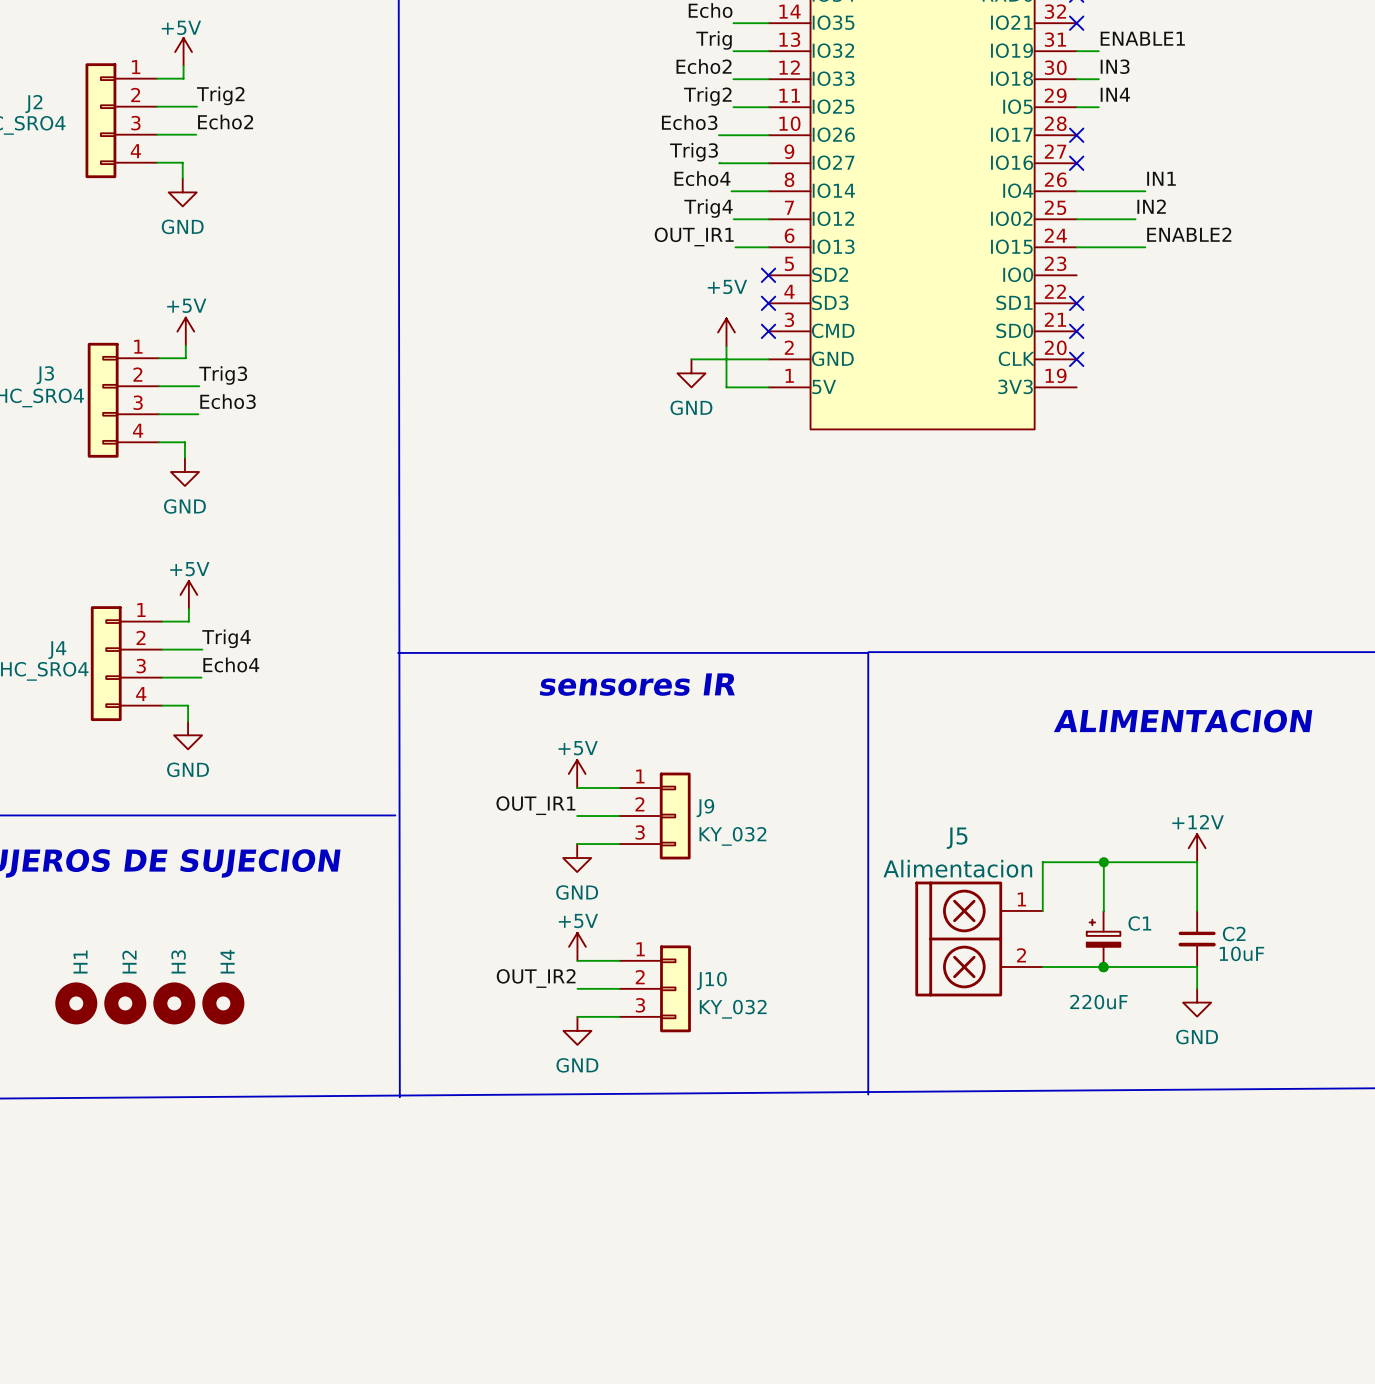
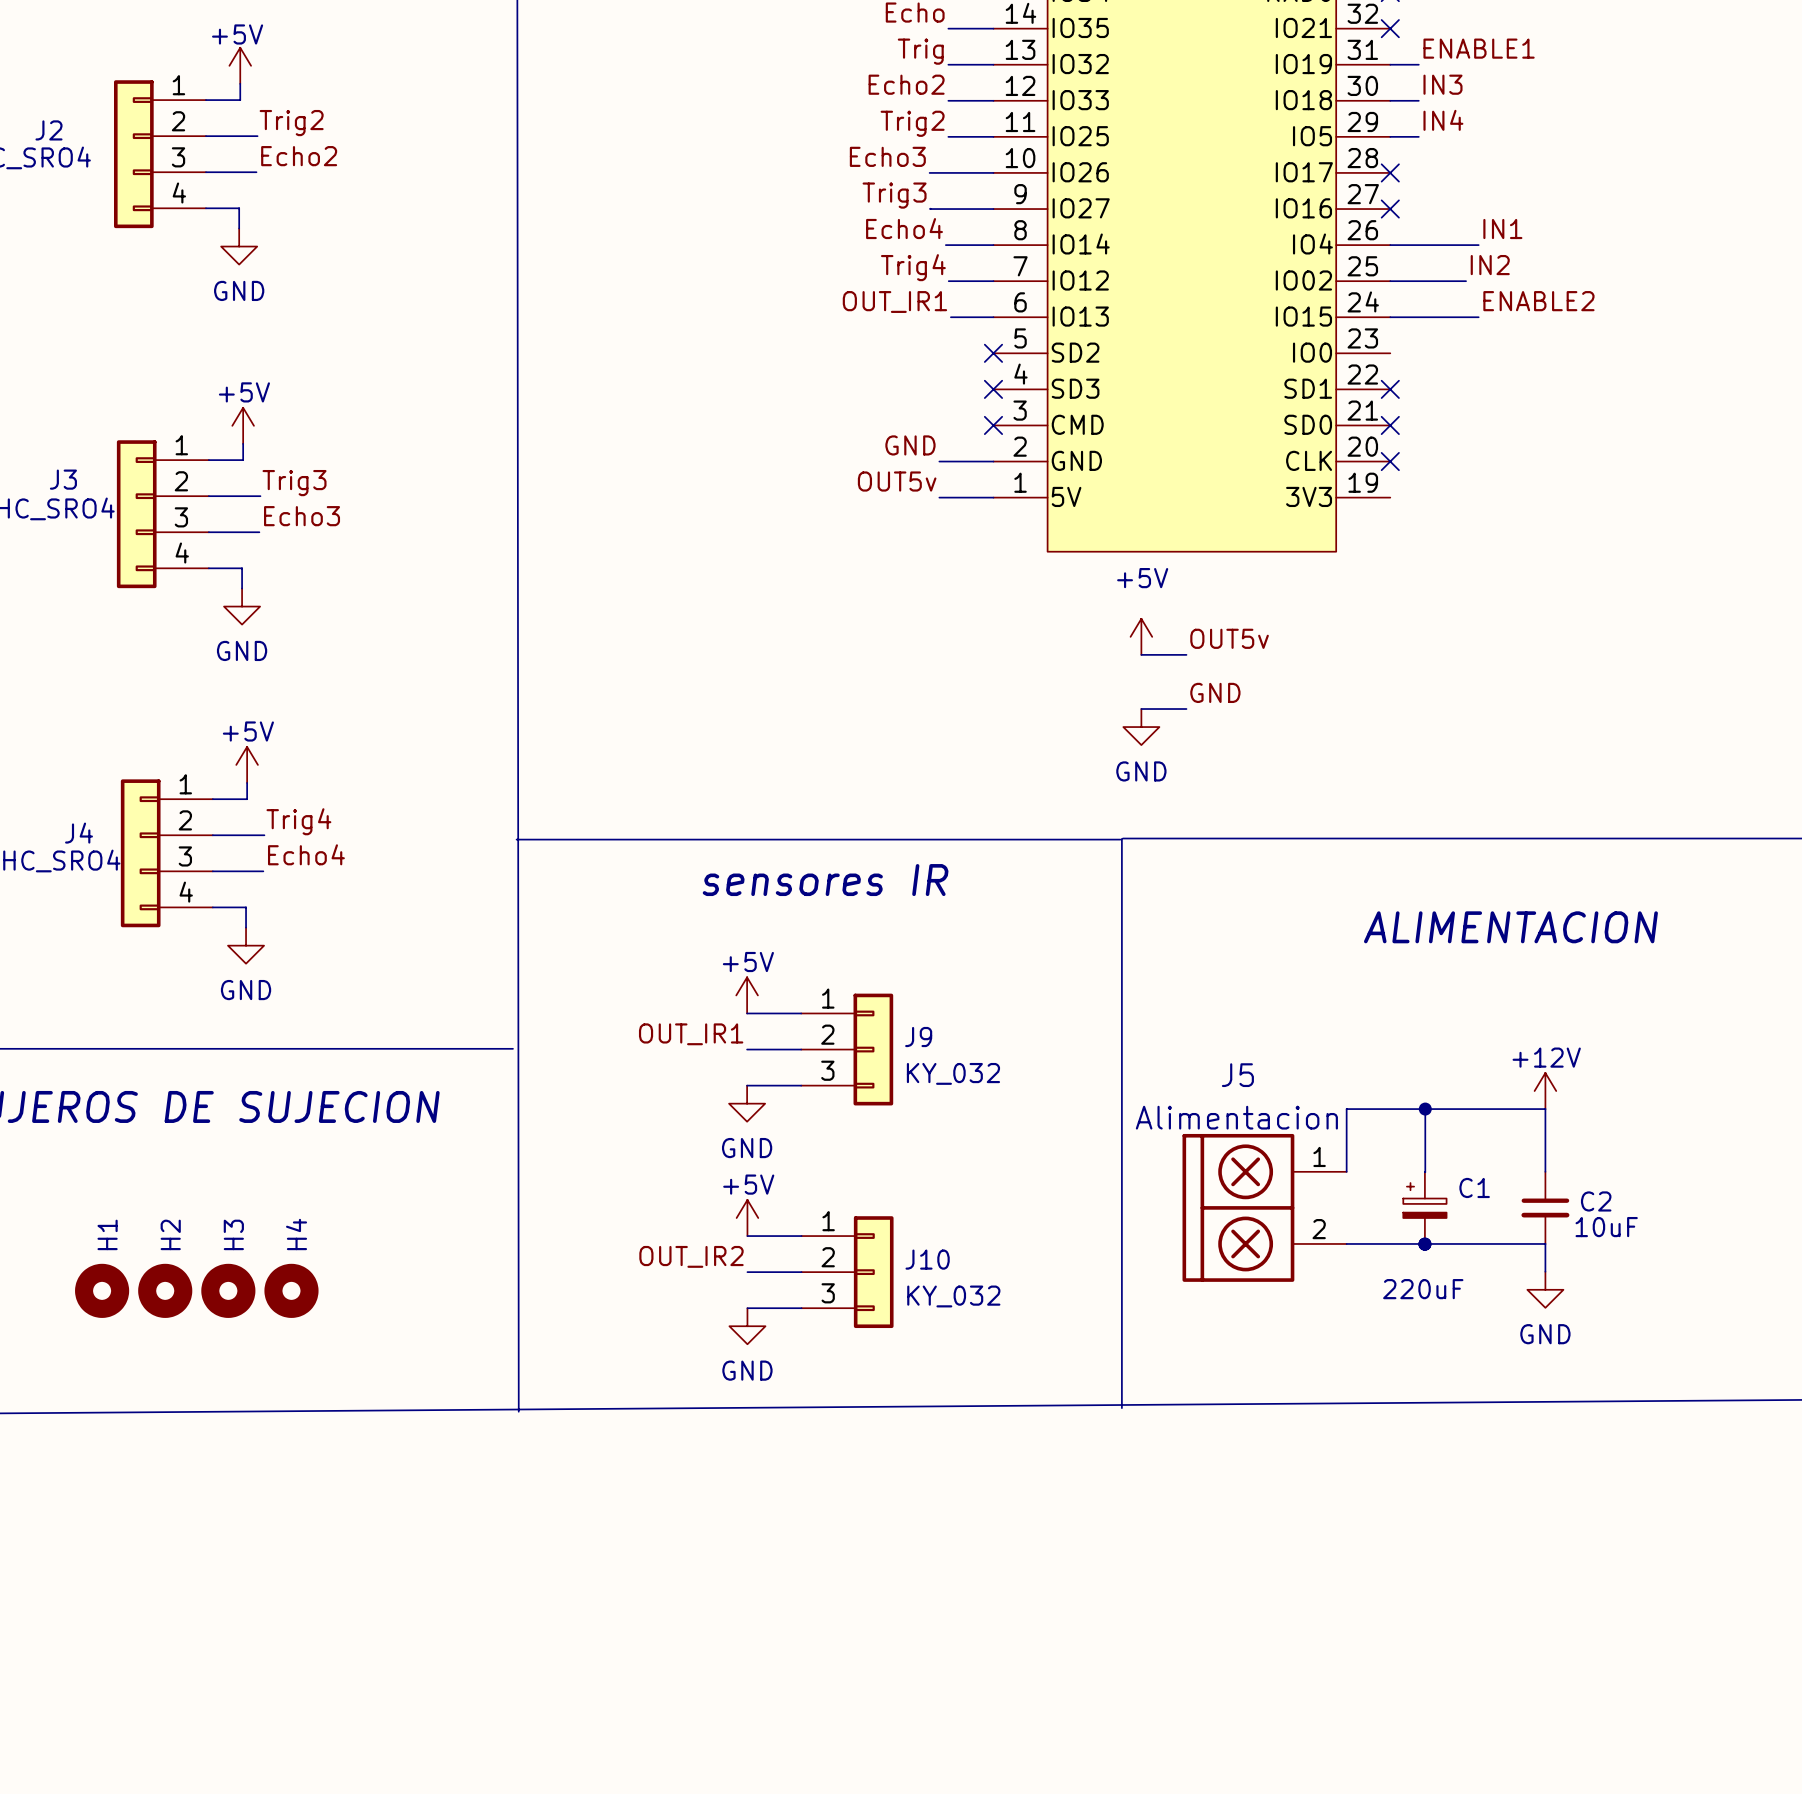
power symbol position: +5V (726, 332) -> +5V (1141, 636)
label: none -> GND (910, 445)
wire: (726, 346) (726, 387) -> none
wire: (691, 359) (726, 359) -> (1141, 654) (1186, 654)
power symbol position: GND (691, 373) -> GND (1141, 727)
label: none -> OUT5v (897, 481)
label: none -> OUT5v (1229, 638)
label: none -> GND (1215, 692)
wire: none -> (1141, 709) (1186, 709)

